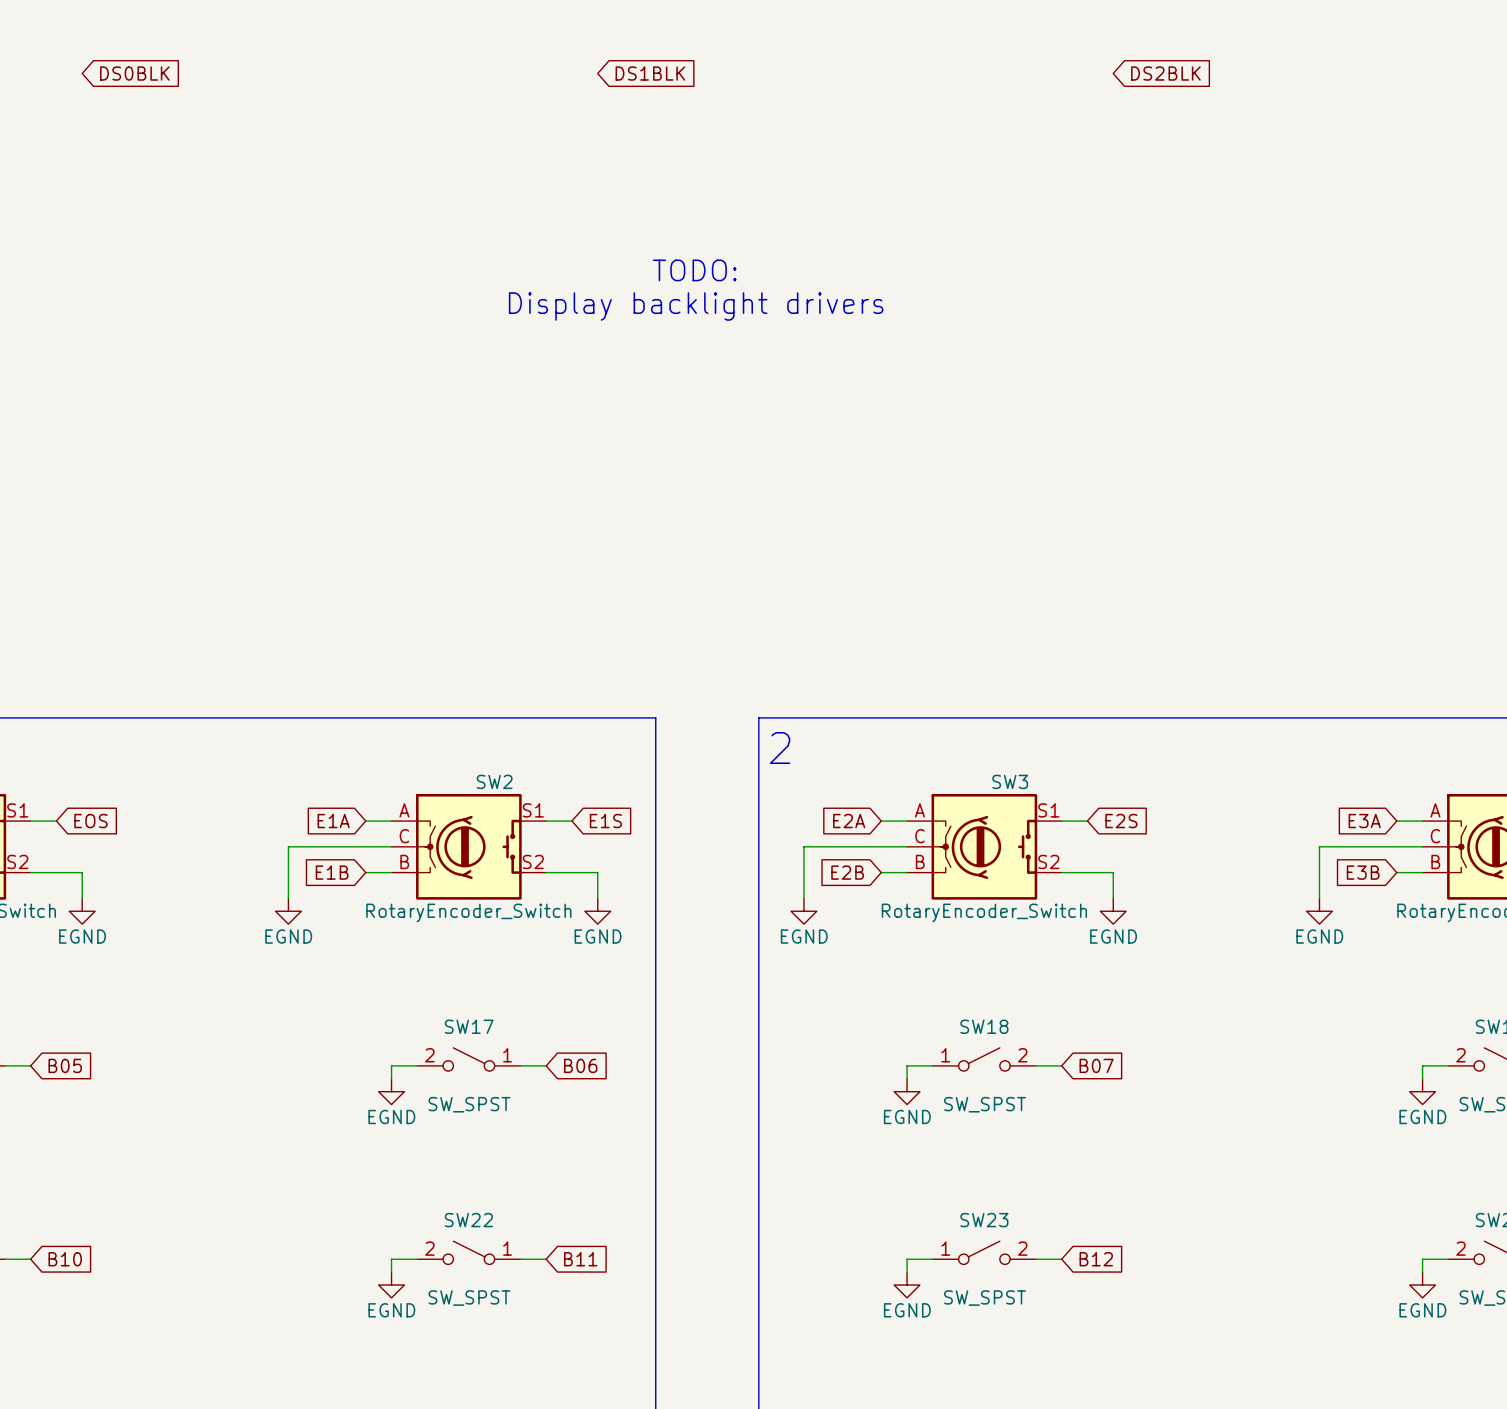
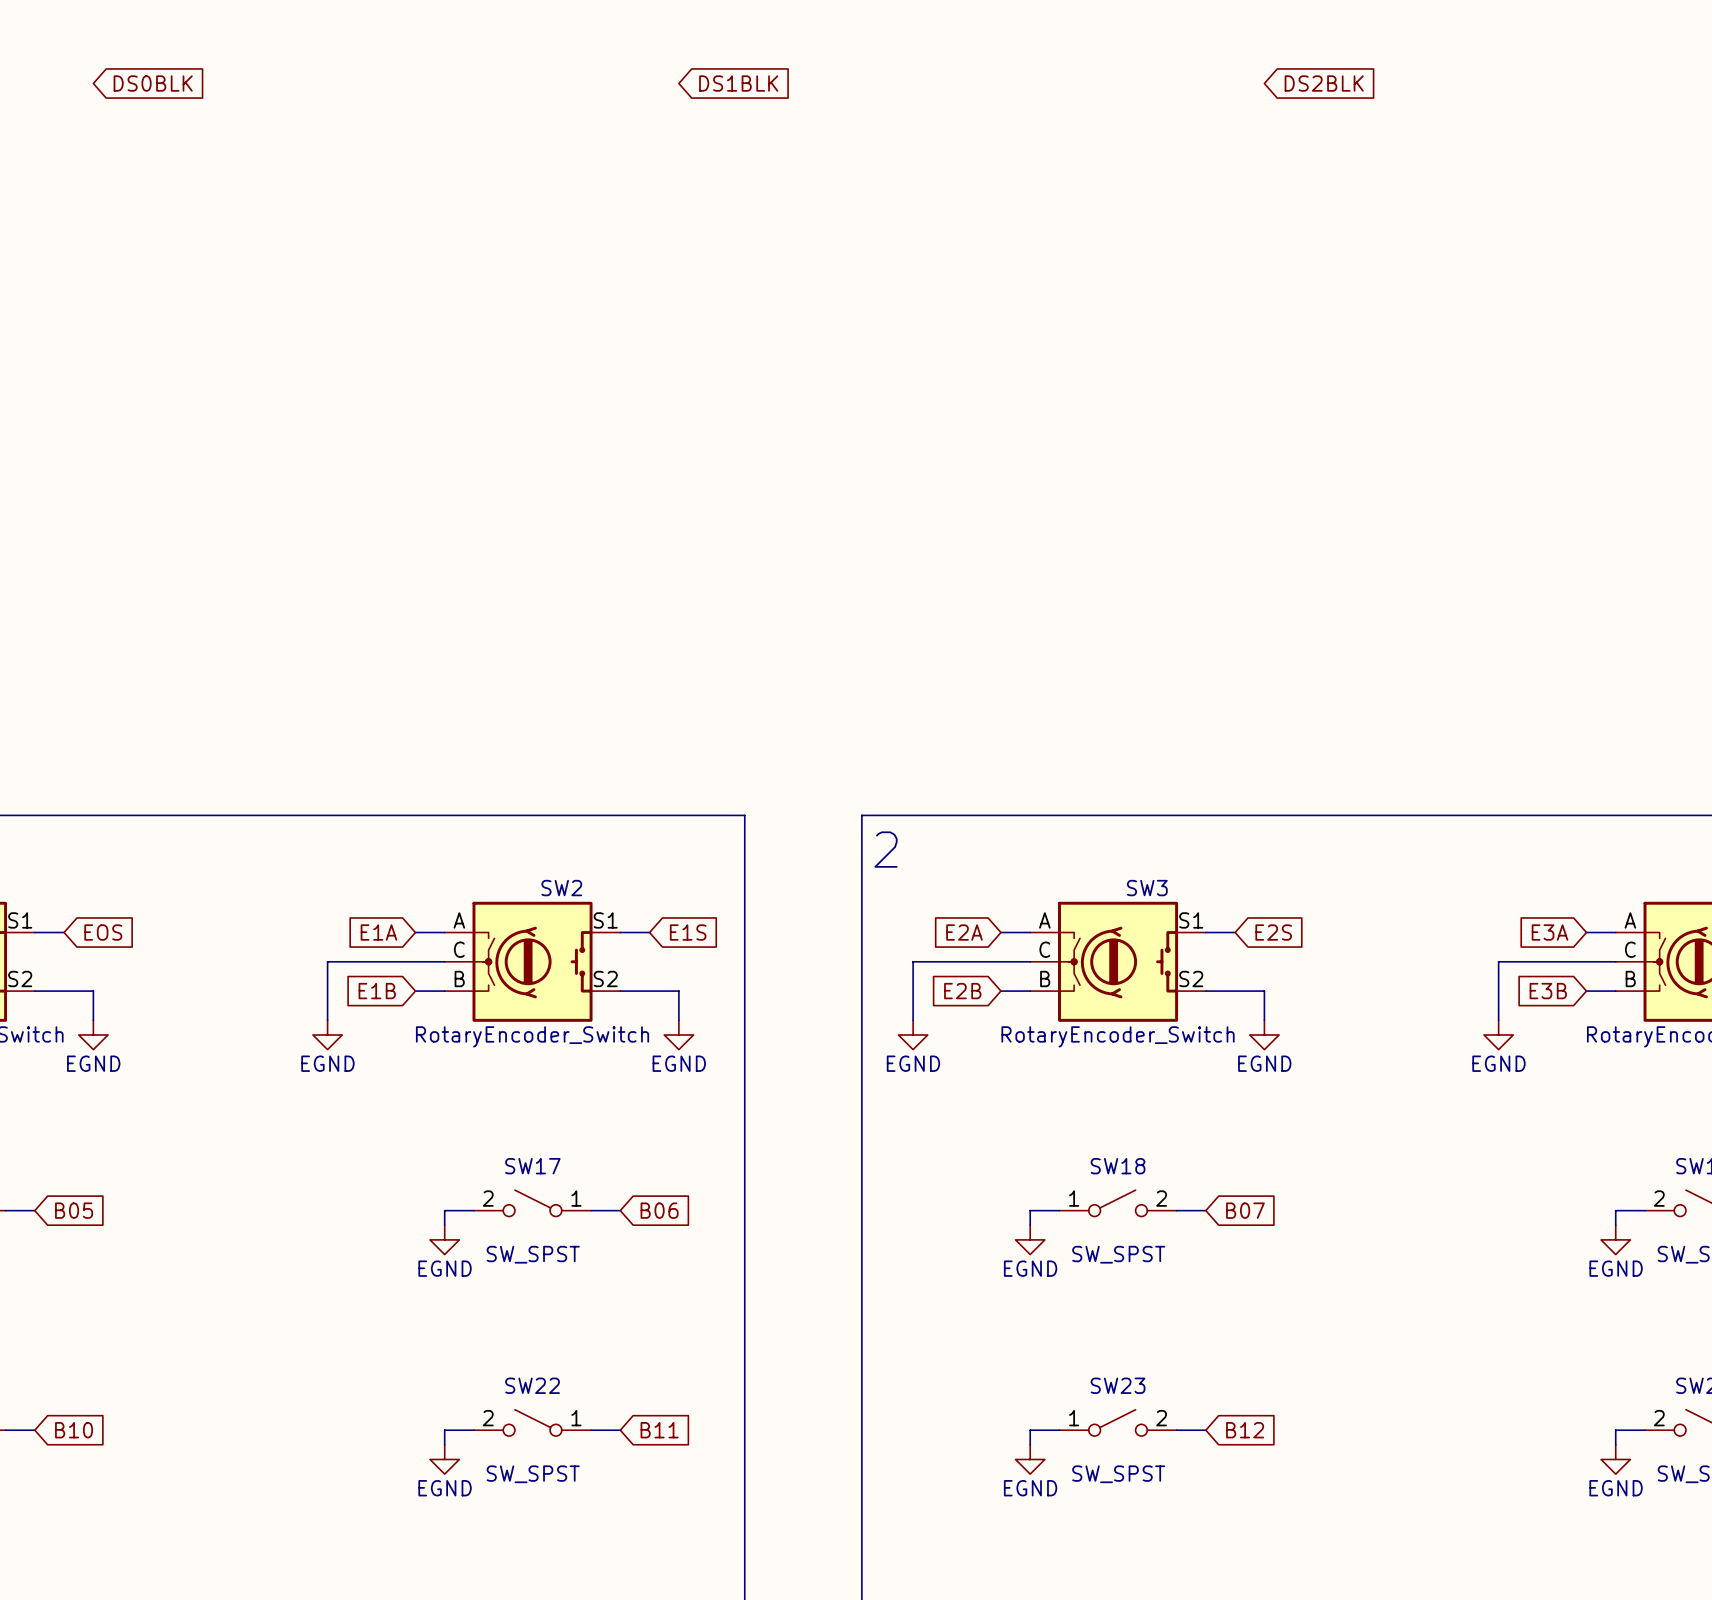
text: TODO: (694, 270) -> none
text: Display backlight drivers (696, 306) -> none

